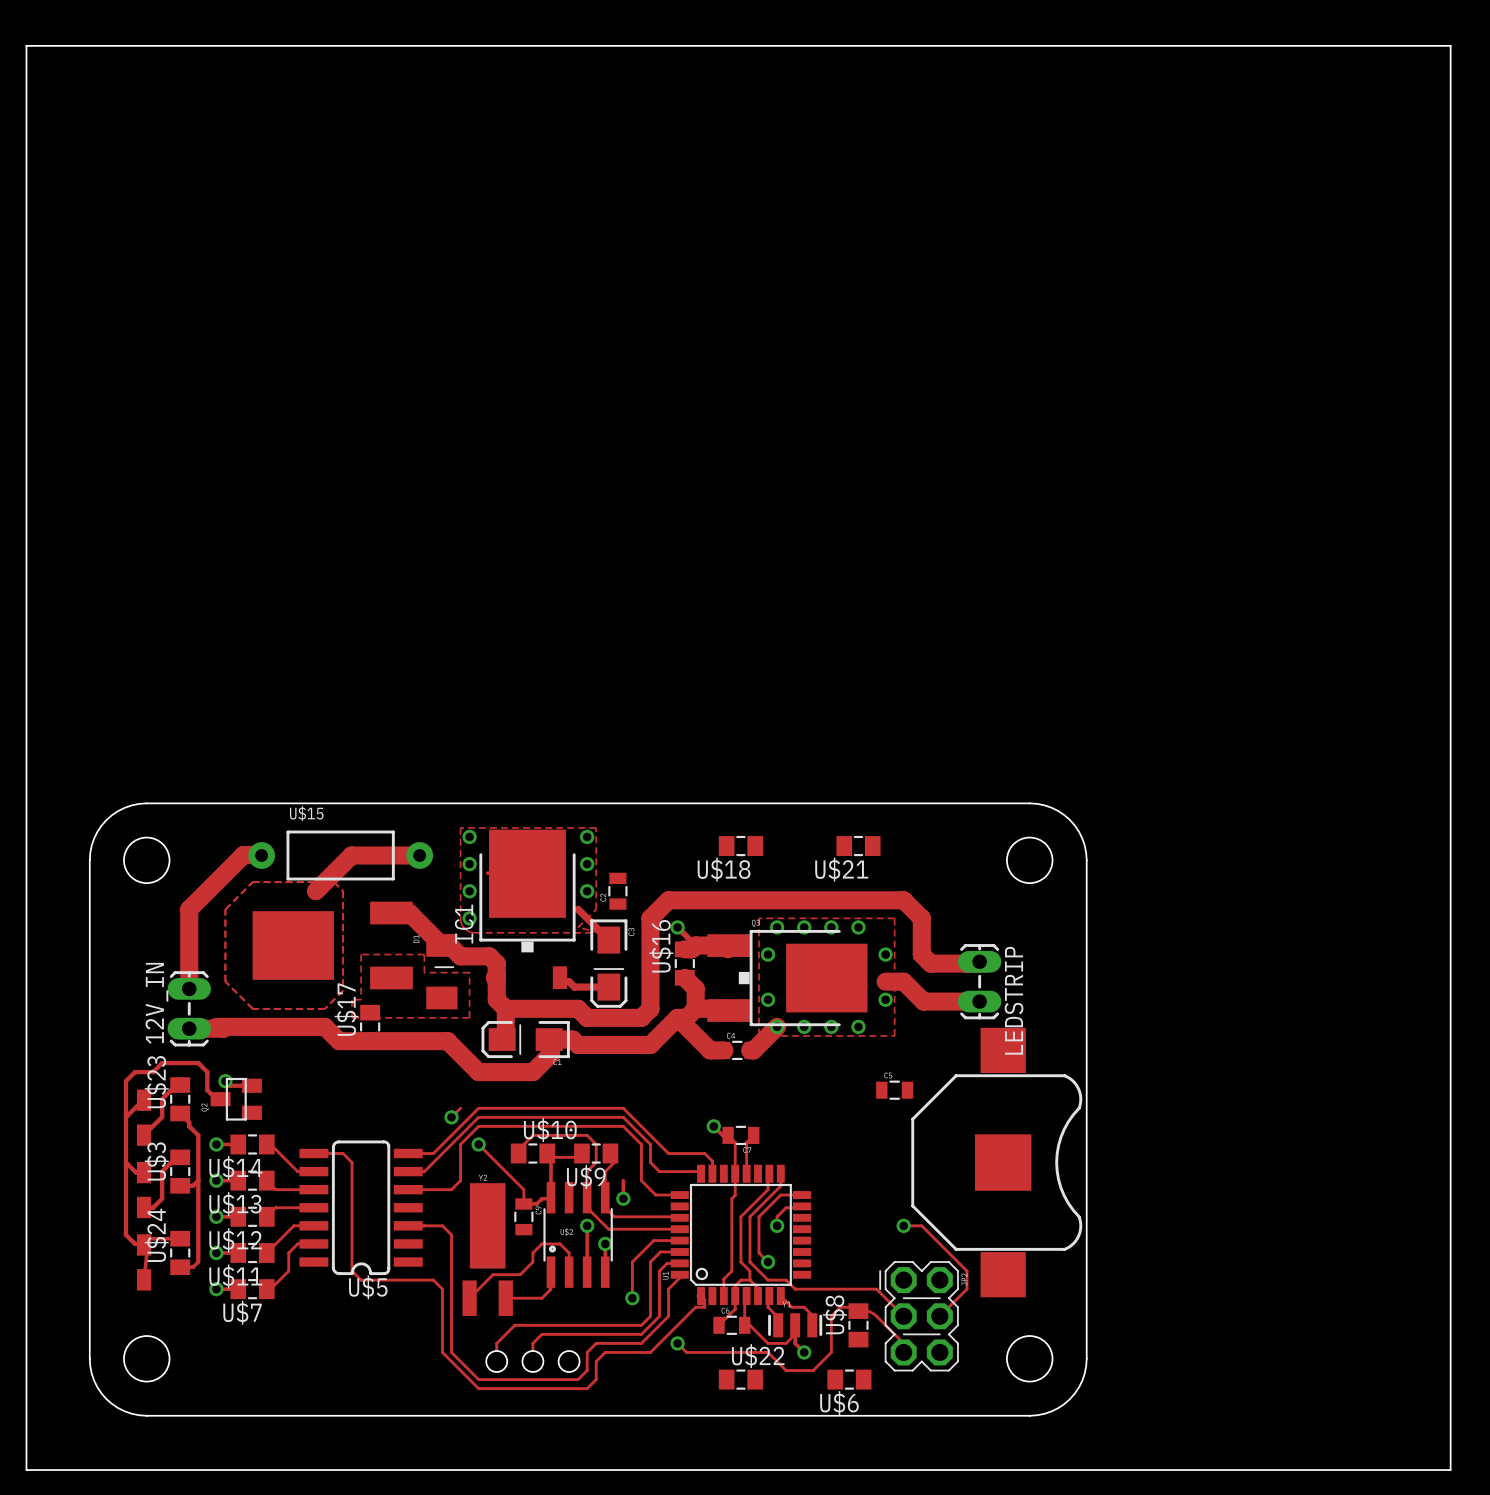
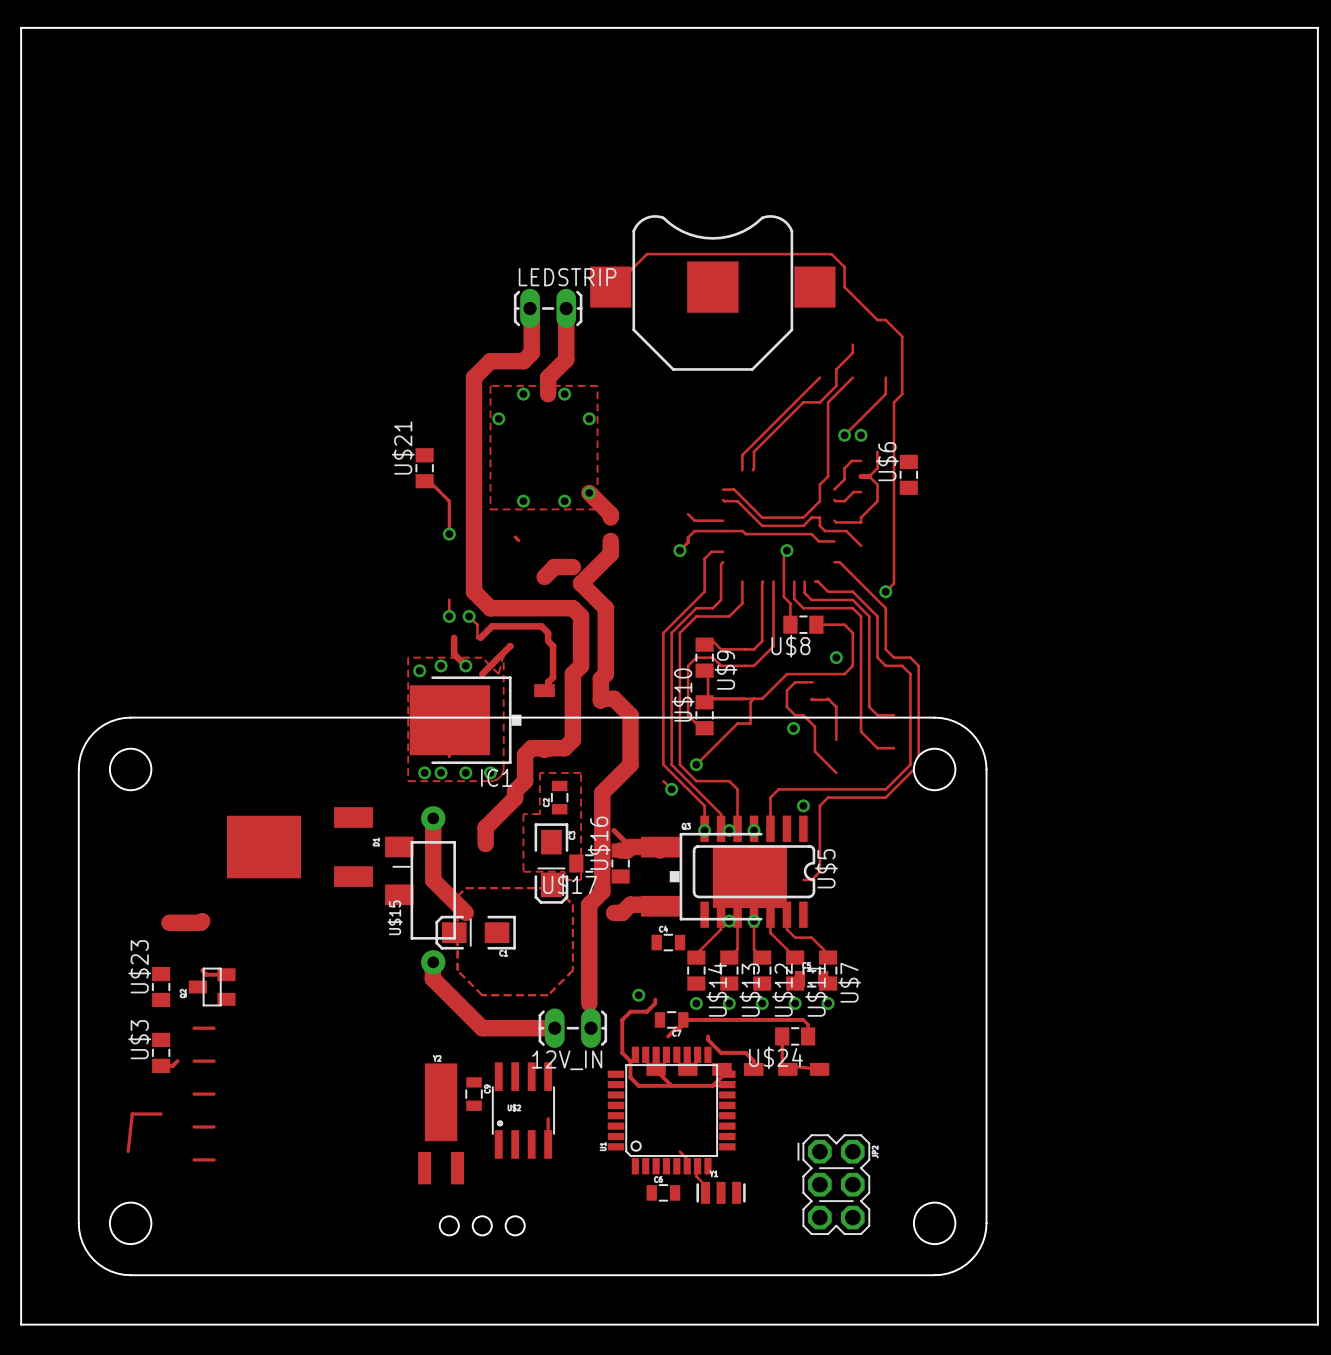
track: none -> (610, 287) (614, 287) (646, 254) (831, 254) (844, 267) (844, 287) (877, 320) (885, 320) (902, 336) (902, 394) (893, 402) (893, 583) (885, 591)
part: none -> (712, 292)
track: none -> (531, 303) (531, 352) (523, 361) (490, 361) (474, 377) (474, 591) (490, 608) (572, 608) (581, 616) (581, 665) (572, 674) (572, 739) (564, 748) (544, 749) (531, 748) (525, 754) (525, 781) (515, 791) (515, 798) (485, 827) (485, 844)
LEDSTRIP: none -> (548, 308)
track: none -> (566, 308) (566, 359) (548, 377) (548, 394)
track: none -> (852, 344) (852, 352) (836, 369) (836, 385) (819, 402) (803, 402) (754, 451) (752, 470)
track: none -> (819, 377) (742, 455) (742, 470)
track: none -> (852, 377) (828, 402) (828, 476) (819, 484) (819, 501) (803, 517) (762, 517) (734, 489) (723, 489)
track: none -> (885, 377) (885, 394) (844, 435)
zone outline: none -> (490, 385) (597, 385) (597, 509) (490, 509) (490, 385)
via: none -> (523, 394)
via: none -> (564, 394)
via: none -> (498, 418)
via: none -> (589, 418)
via: none -> (844, 435)
via: none -> (861, 435)
track: none -> (877, 451) (877, 468) (869, 476)
track: none -> (861, 460) (851, 460) (844, 468) (844, 479) (834, 489)
track: none -> (861, 476) (869, 476)
track: none -> (869, 476) (877, 484) (877, 501) (861, 517) (861, 522) (836, 522) (834, 520)
track: none -> (429, 481) (449, 501) (449, 534) (446, 537)
track: none -> (861, 492) (853, 492) (844, 501) (834, 499)
track: none -> (589, 492) (610, 514) (610, 517)
via: none -> (589, 492)
track: none -> (723, 499) (737, 501) (762, 525) (803, 525) (811, 517) (819, 517) (819, 525) (825, 531) (846, 531) (861, 545)
via: none -> (523, 501)
via: none -> (564, 501)
track: none -> (688, 514) (694, 520) (723, 520)
via: none -> (449, 534)
track: none -> (515, 537) (518, 540)
track: none -> (610, 540) (610, 553) (581, 583) (605, 608) (605, 674) (600, 679) (600, 700) (614, 698) (630, 715) (630, 764) (602, 792) (602, 891) (589, 904) (589, 1003)
track: none -> (834, 541) (818, 541) (811, 534) (745, 534) (742, 531) (694, 531) (688, 537) (688, 542) (679, 550)
via: none -> (679, 550)
track: none -> (786, 550) (783, 553) (783, 596) (790, 603) (790, 624)
via: none -> (786, 550)
track: none -> (723, 551) (711, 551) (704, 558) (704, 591) (663, 632) (663, 764) (704, 805) (704, 828)
track: none -> (723, 562) (721, 564) (721, 600) (712, 608) (696, 608) (671, 632) (671, 764) (721, 814) (721, 828)
track: none -> (572, 567) (554, 567) (544, 576)
track: none -> (742, 581) (742, 603) (729, 616) (696, 616) (679, 632) (679, 764) (696, 781) (729, 781) (737, 789) (737, 828)
track: none -> (763, 581) (762, 641) (754, 649) (721, 649) (712, 641) (708, 641) (704, 644)
track: none -> (773, 581) (773, 646) (754, 665) (721, 665) (712, 657) (696, 657) (688, 665) (688, 715) (704, 728)
track: none -> (794, 581) (794, 599) (803, 608) (852, 608) (861, 616) (861, 731) (877, 748) (893, 748)
track: none -> (804, 581) (804, 592) (811, 600) (852, 600) (869, 616) (869, 707) (877, 715) (893, 715)
track: none -> (815, 581) (817, 581) (828, 591) (852, 591) (877, 616) (877, 657) (885, 665) (902, 665) (910, 674) (910, 764) (885, 789) (778, 789) (770, 797) (770, 838)
via: none -> (885, 591)
track: none -> (449, 599) (449, 616)
via: none -> (449, 616)
track: none -> (469, 616) (477, 624) (477, 637) (480, 637) (492, 626) (541, 626) (548, 632) (548, 641) (553, 646) (553, 677) (544, 690)
via: none -> (469, 616)
track: none -> (816, 624) (844, 624) (852, 632) (852, 665) (844, 674) (786, 674) (762, 698) (708, 698)
track: none -> (454, 637) (454, 654) (465, 665)
track: none -> (510, 646) (482, 674)
zone outline: none -> (503, 654) (503, 768) (501, 776) (490, 781) (408, 781) (408, 657) (482, 657) (498, 674) (503, 654)
via: none -> (836, 657)
via: none -> (441, 665)
via: none -> (465, 665)
via: none -> (419, 670)
track: none -> (704, 670) (708, 674) (708, 698)
track: none -> (812, 682) (795, 682) (786, 690) (786, 707) (795, 715) (803, 715) (814, 726) (814, 751) (836, 772)
track: none -> (754, 698) (750, 702) (750, 723) (737, 723) (696, 764)
track: none -> (812, 698) (828, 698) (836, 707) (836, 739)
U$15 name position: U$15 (306, 813) -> U$15 (395, 917)
via: none -> (793, 728)
via: (469, 836) -> none
via: (587, 836) -> none
U$18: (740, 846) -> none
U$21 rotation: 0° (858, 846) -> 90° clockwise (424, 468)
U$21 position: (858, 846) -> (424, 468)
track: (261, 855) (243, 855) (189, 909) (189, 988) -> none
U$15 rotation: 0° (340, 855) -> 90° clockwise (433, 890)
U$15 position: (340, 855) -> (433, 890)
track: (419, 855) (351, 855) (315, 891) -> none
via: none -> (696, 764)
via: none -> (441, 772)
via: none -> (465, 772)
via: none -> (490, 772)
via: (587, 864) -> none
zone outline: (596, 864) (596, 827) (460, 827) (460, 920) (467, 930) (474, 932) (599, 932) (578, 927) (596, 909) -> (539, 772) (581, 772) (581, 879) (564, 879) (564, 871) (523, 871) (523, 814) (539, 814)
track: none -> (663, 781) (671, 789)
zone outline: (252, 882) (225, 909) (225, 981) (252, 1008) (324, 1008) (343, 990) (343, 891) (333, 882) (252, 882) -> none
via: none -> (671, 789)
via: (469, 891) -> none
via: (587, 891) -> none
via: none -> (803, 805)
IC1 rotation: 0° (527, 909) -> 90° counterclockwise (482, 720)
IC1 position: (527, 909) -> (482, 720)
track: (578, 909) (608, 940) -> none
track: (391, 913) (409, 913) (441, 945) (449, 945) (460, 956) (489, 956) (496, 963) (496, 975) (495, 977) (496, 979) (496, 999) -> (433, 818) (433, 880) (449, 896)
via: (469, 918) -> none
zone outline: (759, 918) (894, 918) (894, 1035) (759, 1035) (759, 918) -> none
via: (677, 927) -> none
via: (858, 927) -> none
zone outline: (361, 954) (361, 999) (352, 999) (352, 1017) (469, 1017) (469, 972) (424, 972) (424, 954) (361, 954) -> none
via: (768, 954) -> none
via: (885, 954) -> none
track: (985, 963) (930, 963) (921, 954) (921, 918) (903, 900) (668, 900) (650, 918) (650, 1008) (641, 1017) (587, 1017) (578, 1008) (505, 1008) (505, 1035) (502, 1039) -> none
track: (559, 977) (563, 981) (569, 981) (574, 987) (608, 987) -> none
track: (684, 977) (695, 988) (695, 1008) -> none
track width: thick (885, 981) (894, 981) -> thin (803, 879) (811, 879)
track: (894, 981) (903, 981) (923, 1001) (979, 1001) -> (811, 879) (819, 871) (819, 805) (828, 797) (885, 797) (918, 764) (918, 665) (910, 657) (893, 657) (885, 649) (885, 608) (839, 562) (834, 562)
LEDSTRIP: (979, 981) -> none
zone outline: none -> (465, 888) (457, 896) (457, 970) (482, 995) (548, 995) (572, 970) (572, 904) (556, 888) (465, 888)
via: (768, 999) -> none
via: (885, 999) -> none
12V_IN name position: 12V_IN (156, 1003) -> 12V_IN (567, 1060)
12V_IN rotation: 0° (189, 1008) -> 90° clockwise (572, 1028)
12V_IN position: (189, 1008) -> (572, 1028)
track: none -> (457, 904) (465, 912)
U$17 name position: U$17 (346, 1009) -> U$17 (570, 884)
track: none -> (721, 914) (721, 929) (696, 954) (696, 957)
track: none -> (737, 914) (737, 949) (729, 957)
track: none -> (754, 914) (754, 949) (762, 957)
track: none -> (770, 914) (770, 932) (795, 957)
track: none -> (786, 914) (786, 929) (795, 937) (811, 937) (828, 954) (828, 957)
track: (216, 1026) (324, 1026) (339, 1041) (447, 1041) (478, 1072) (532, 1072) (551, 1054) (551, 1041) (549, 1039) (572, 1039) (578, 1044) (650, 1044) (677, 1017) (710, 1050) (724, 1050) -> none
U$17 rotation: 0° (370, 1026) -> 90° clockwise (589, 863)
U$17 position: (370, 1026) -> (589, 863)
track: (777, 1026) (753, 1050) (750, 1050) -> none
via: (777, 1026) -> none
via: (858, 1026) -> none
track: none -> (433, 962) (432, 978) (482, 1028) (554, 1028)
via: (225, 1081) -> none
track: (180, 1085) (175, 1090) (171, 1090) (162, 1099) (162, 1117) (144, 1135) -> none
track: (220, 1099) (216, 1099) (207, 1090) (207, 1072) (198, 1063) (162, 1063) (153, 1072) (135, 1072) (125, 1081) (125, 1234) (135, 1243) (144, 1244) -> none
track: (144, 1100) (125, 1117) -> none
track: (460, 1108) (451, 1117) -> none
track: (180, 1113) (198, 1135) (198, 1262) (193, 1267) (180, 1267) -> none
track: none -> (655, 999) (655, 1003) (646, 1011) (630, 1011) (622, 1019) (622, 1052) (630, 1061) (630, 1077) (638, 1085) (712, 1085) (721, 1076) (721, 1069)
part: (144, 1117) -> none
via: (451, 1117) -> none
via: none -> (696, 1003)
via: none -> (729, 1003)
via: none -> (762, 1003)
via: none -> (795, 1003)
via: none -> (828, 1003)
track: (713, 1126) (722, 1135) (728, 1135) (735, 1142) (735, 1195) (731, 1198) (731, 1271) (723, 1279) (723, 1296) -> none
via position: (713, 1126) -> (638, 995)
U$10 name position: U$10 (550, 1129) -> U$10 (683, 695)
track: (753, 1135) (746, 1142) (746, 1173) -> none
via: (216, 1144) -> none
U$14 rotation: 0° (252, 1144) -> 90° clockwise (696, 970)
U$14 position: (252, 1144) -> (696, 970)
track: (266, 1144) (270, 1144) (297, 1171) (313, 1171) -> none
track: (478, 1144) (523, 1189) (523, 1203) (536, 1203) (541, 1198) (551, 1197) (551, 1157) -> none
via: (478, 1144) -> none
track: (313, 1153) (343, 1153) (352, 1162) (352, 1271) (361, 1280) (433, 1280) (442, 1289) (442, 1352) (478, 1388) (587, 1388) (596, 1379) (596, 1361) (605, 1352) (650, 1352) (695, 1307) (704, 1307) (704, 1299) (701, 1296) (697, 1296) -> none
track: (408, 1153) (433, 1153) (478, 1108) (623, 1108) (668, 1153) (704, 1153) (712, 1161) (712, 1173) -> none
track: (518, 1153) (523, 1148) (523, 1144) (532, 1135) (587, 1135) (596, 1144) (596, 1162) (587, 1171) (587, 1207) (608, 1229) (679, 1229) -> none
U$10 rotation: 0° (532, 1153) -> 90° clockwise (704, 715)
U$10 position: (532, 1153) -> (704, 715)
track: (581, 1153) (578, 1157) (551, 1157) -> none
U$9 rotation: 0° (596, 1153) -> 90° clockwise (704, 657)
U$9 position: (596, 1153) -> (704, 657)
track: (610, 1153) (614, 1157) (614, 1162) (605, 1171) (605, 1207) (614, 1216) (679, 1217) -> none
track: none -> (668, 1036) (688, 1019) (803, 1019) (808, 1024) (808, 1036)
track: none -> (708, 1036) (708, 1039) (721, 1052) (745, 1052) (754, 1061) (753, 1069)
track: none -> (782, 1036) (782, 1065) (819, 1069)
track: (180, 1157) (176, 1157) (162, 1171) (162, 1198) (153, 1207) (144, 1207) -> none
track: (125, 1162) (136, 1172) (144, 1172) -> none
part: (996, 1162) -> none
U$14 name position: U$14 (235, 1167) -> U$14 (717, 989)
track: (408, 1171) (424, 1171) (478, 1117) (623, 1117) (650, 1144) (650, 1162) (659, 1171) (698, 1171) (701, 1173) -> none
track: (769, 1173) (768, 1189) (740, 1216) (740, 1262) (749, 1271) (749, 1280) (740, 1280) (735, 1285) (735, 1309) (719, 1325) -> none
track: (780, 1173) (780, 1185) (749, 1216) (749, 1262) (768, 1280) (786, 1280) (795, 1289) (876, 1289) (903, 1316) -> none
U$9 name position: U$9 (586, 1177) -> U$9 (726, 670)
via: (216, 1180) -> none
U$13 rotation: 0° (252, 1180) -> 90° clockwise (729, 970)
U$13 position: (252, 1180) -> (729, 970)
track: (266, 1180) (275, 1189) (313, 1189) -> none
track: (623, 1180) (623, 1198) -> none
track: (408, 1189) (451, 1189) (460, 1180) (460, 1144) (478, 1126) (623, 1126) (641, 1144) (641, 1180) (655, 1195) (679, 1195) -> none
track: none -> (656, 1069) (671, 1085)
part: none -> (671, 1069)
part: none -> (737, 1069)
part: none -> (803, 1069)
part: (144, 1190) -> none
track: (802, 1195) (780, 1195) (759, 1216) (759, 1252) (768, 1262) -> none
via: (623, 1198) -> none
U$13 name position: U$13 (235, 1204) -> U$13 (750, 990)
track: (313, 1207) (275, 1207) (266, 1216) -> none
U$5 rotation: 0° (361, 1207) -> 90° counterclockwise (754, 871)
U$5 position: (361, 1207) -> (754, 871)
track: (786, 1207) (777, 1216) (777, 1225) -> none
via: (216, 1216) -> none
U$12 rotation: 0° (252, 1216) -> 90° clockwise (762, 970)
U$12 position: (252, 1216) -> (762, 970)
track: (313, 1225) (293, 1225) (266, 1252) -> none
track: (397, 1225) (442, 1225) (451, 1234) (451, 1352) (478, 1379) (578, 1379) (587, 1370) (587, 1352) (596, 1343) (641, 1343) (668, 1316) (668, 1289) (679, 1277) (679, 1274) -> none
track: (587, 1225) (587, 1272) -> none
via: (587, 1225) -> none
via: (777, 1225) -> none
track: (903, 1225) (921, 1225) (966, 1271) (966, 1289) (939, 1316) -> none
via: (903, 1225) -> none
U$24 name position: U$24 (156, 1235) -> U$24 (775, 1057)
U$12 name position: U$12 (235, 1240) -> U$12 (783, 990)
track: (679, 1240) (653, 1240) (632, 1262) (632, 1298) -> none
track: (313, 1243) (297, 1243) (288, 1252) (288, 1271) (270, 1289) (266, 1289) -> none
via: (605, 1243) -> none
track: (679, 1251) (660, 1251) (650, 1262) (650, 1316) (641, 1325) (514, 1325) (496, 1343) (496, 1361) -> none
U$24 rotation: 0° (180, 1252) -> 90° clockwise (795, 1036)
U$24 position: (180, 1252) -> (795, 1036)
via: (216, 1252) -> none
U$11 rotation: 0° (252, 1252) -> 90° clockwise (795, 970)
U$11 position: (252, 1252) -> (795, 970)
part: (144, 1262) -> none
via: (768, 1262) -> none
track: (679, 1263) (667, 1263) (659, 1271) (659, 1316) (641, 1334) (541, 1334) (532, 1343) (532, 1361) -> none
track: (551, 1272) (549, 1271) (551, 1289) (541, 1298) (505, 1298) -> none
track: (569, 1272) (569, 1252) (560, 1243) (541, 1243) (532, 1252) (532, 1262) (520, 1274) (493, 1274) (469, 1298) -> none
U$11 name position: U$11 (235, 1276) -> U$11 (816, 990)
via: (216, 1289) -> none
U$7 rotation: 0° (252, 1289) -> 90° clockwise (828, 970)
U$7 position: (252, 1289) -> (828, 970)
track: (746, 1296) (744, 1297) (744, 1325) (749, 1325) (768, 1343) (786, 1343) (795, 1334) -> none
track: (780, 1296) (792, 1307) (804, 1307) (812, 1315) (812, 1325) -> none
via: (632, 1298) -> none
U$7 name position: U$7 (242, 1312) -> U$7 (849, 982)
U$8 name position: U$8 (834, 1314) -> U$8 (790, 646)
U$8 rotation: 0° (858, 1325) -> 90° clockwise (803, 624)
U$8 position: (858, 1325) -> (803, 624)
track: (795, 1334) (795, 1343) (804, 1352) -> none
track: (677, 1343) (686, 1352) (768, 1352) (786, 1370) (813, 1370) (831, 1352) (831, 1316) (840, 1307) (858, 1307) (858, 1311) (865, 1310) (874, 1314) (903, 1343) (903, 1352) -> none
via: (677, 1343) -> none
via: (804, 1352) -> none
U$22: (740, 1379) -> none
U$6 rotation: 0° (849, 1379) -> 90° clockwise (908, 474)
U$6 position: (849, 1379) -> (908, 474)

